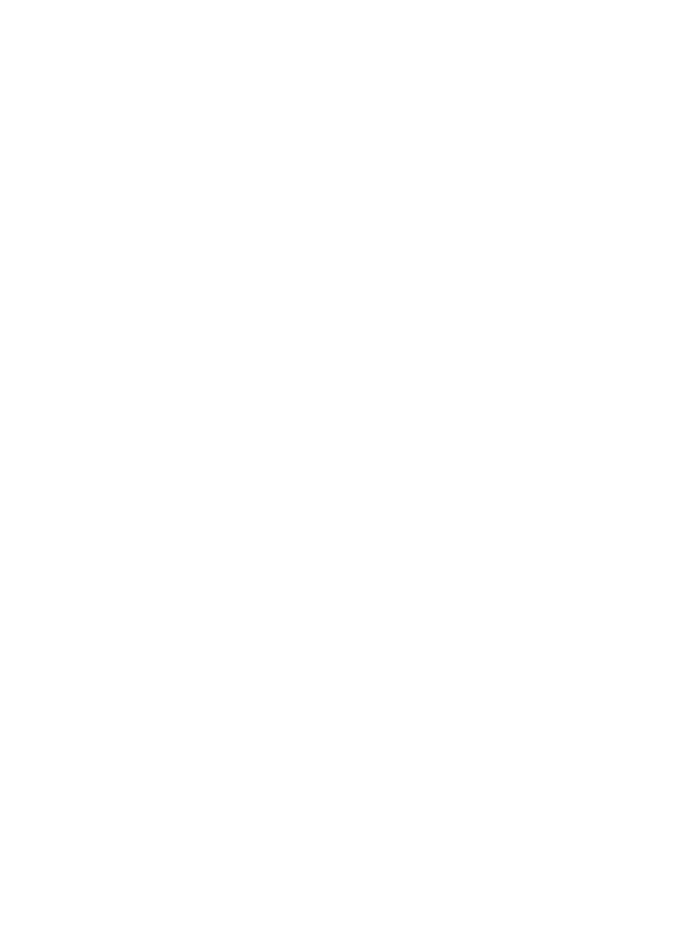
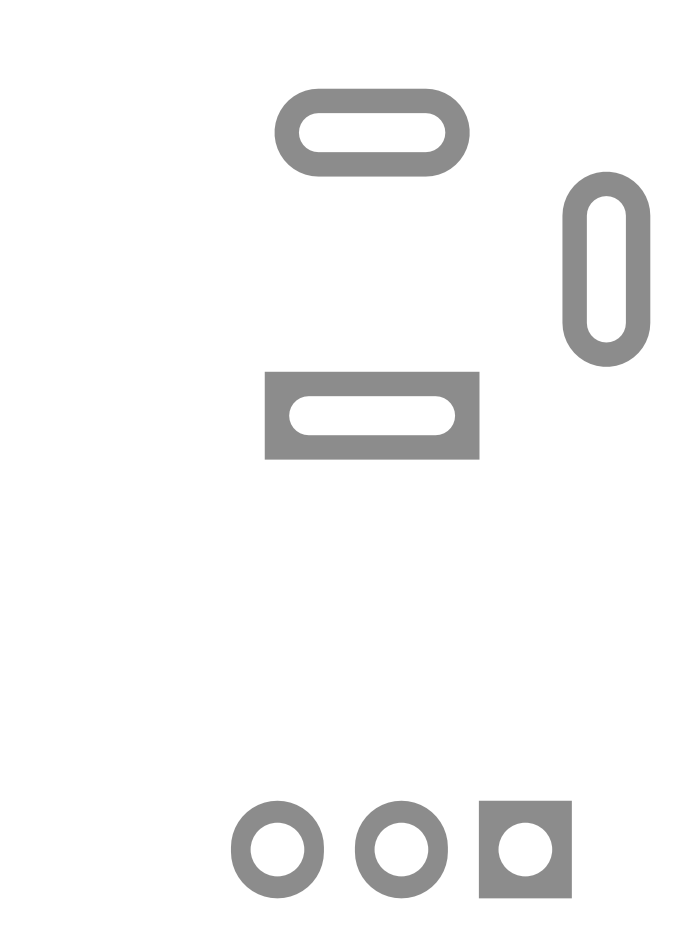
part: none -> (457, 274)
part: none -> (401, 849)

